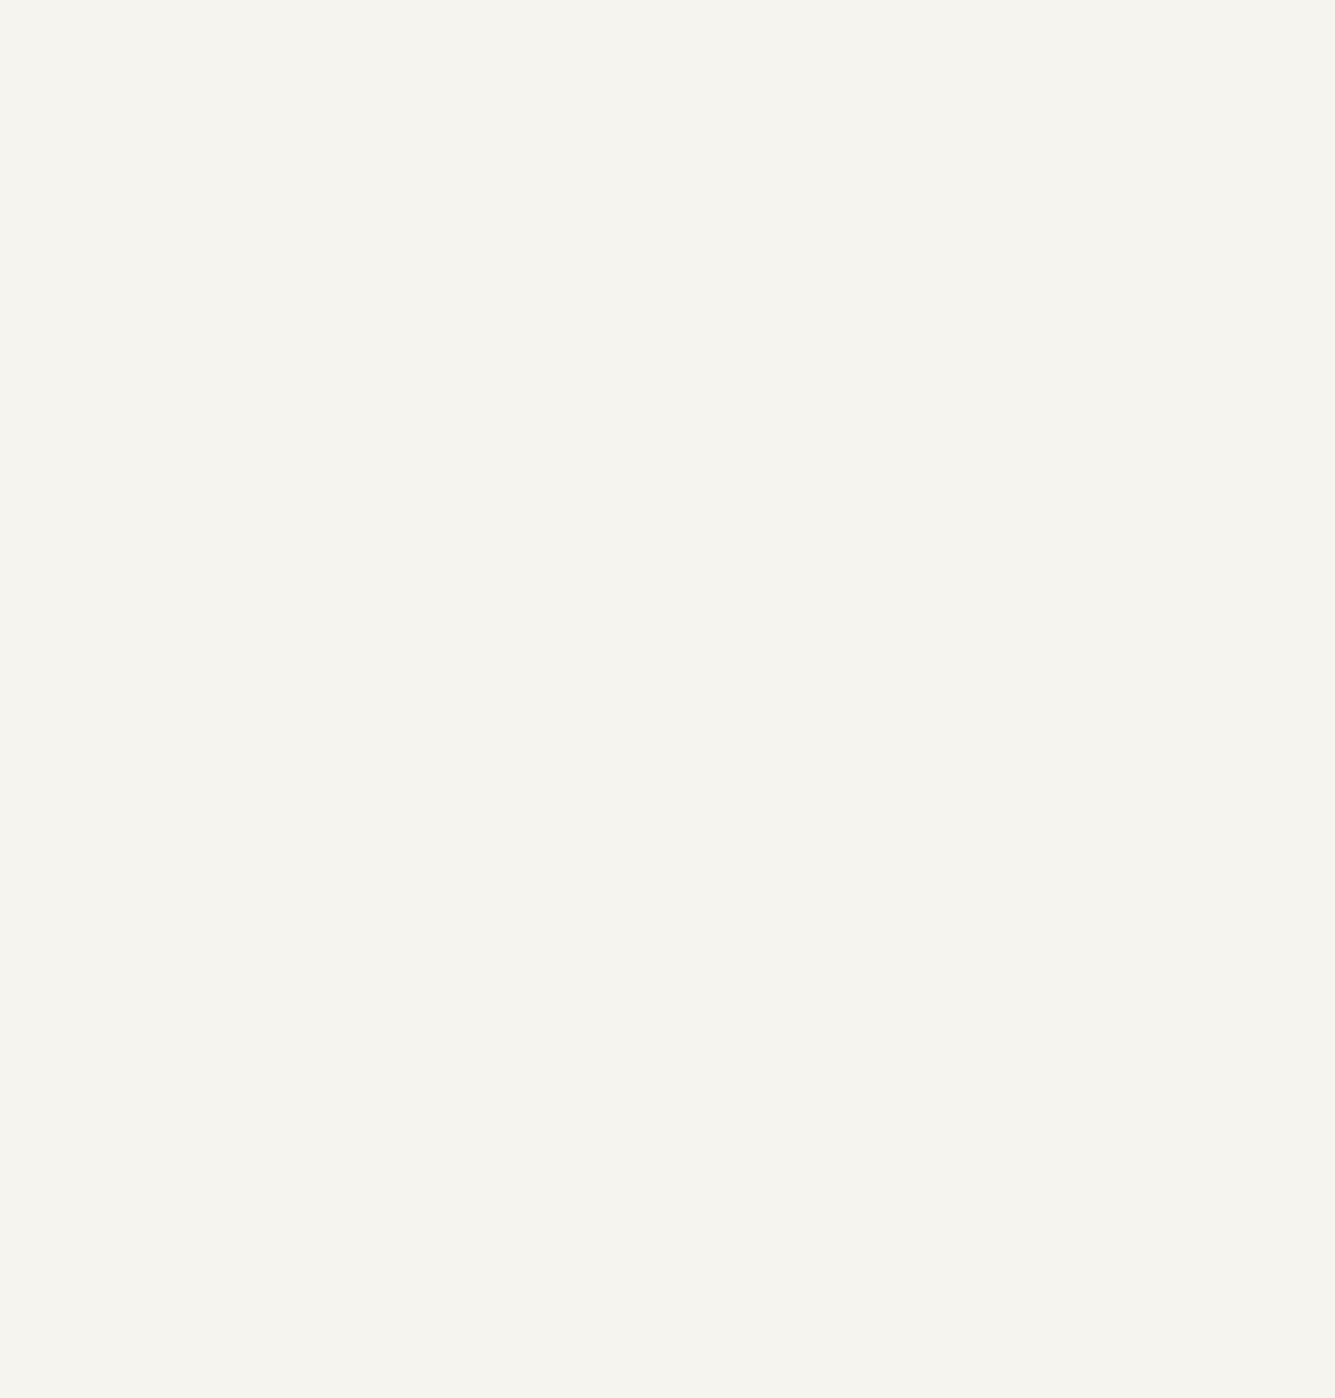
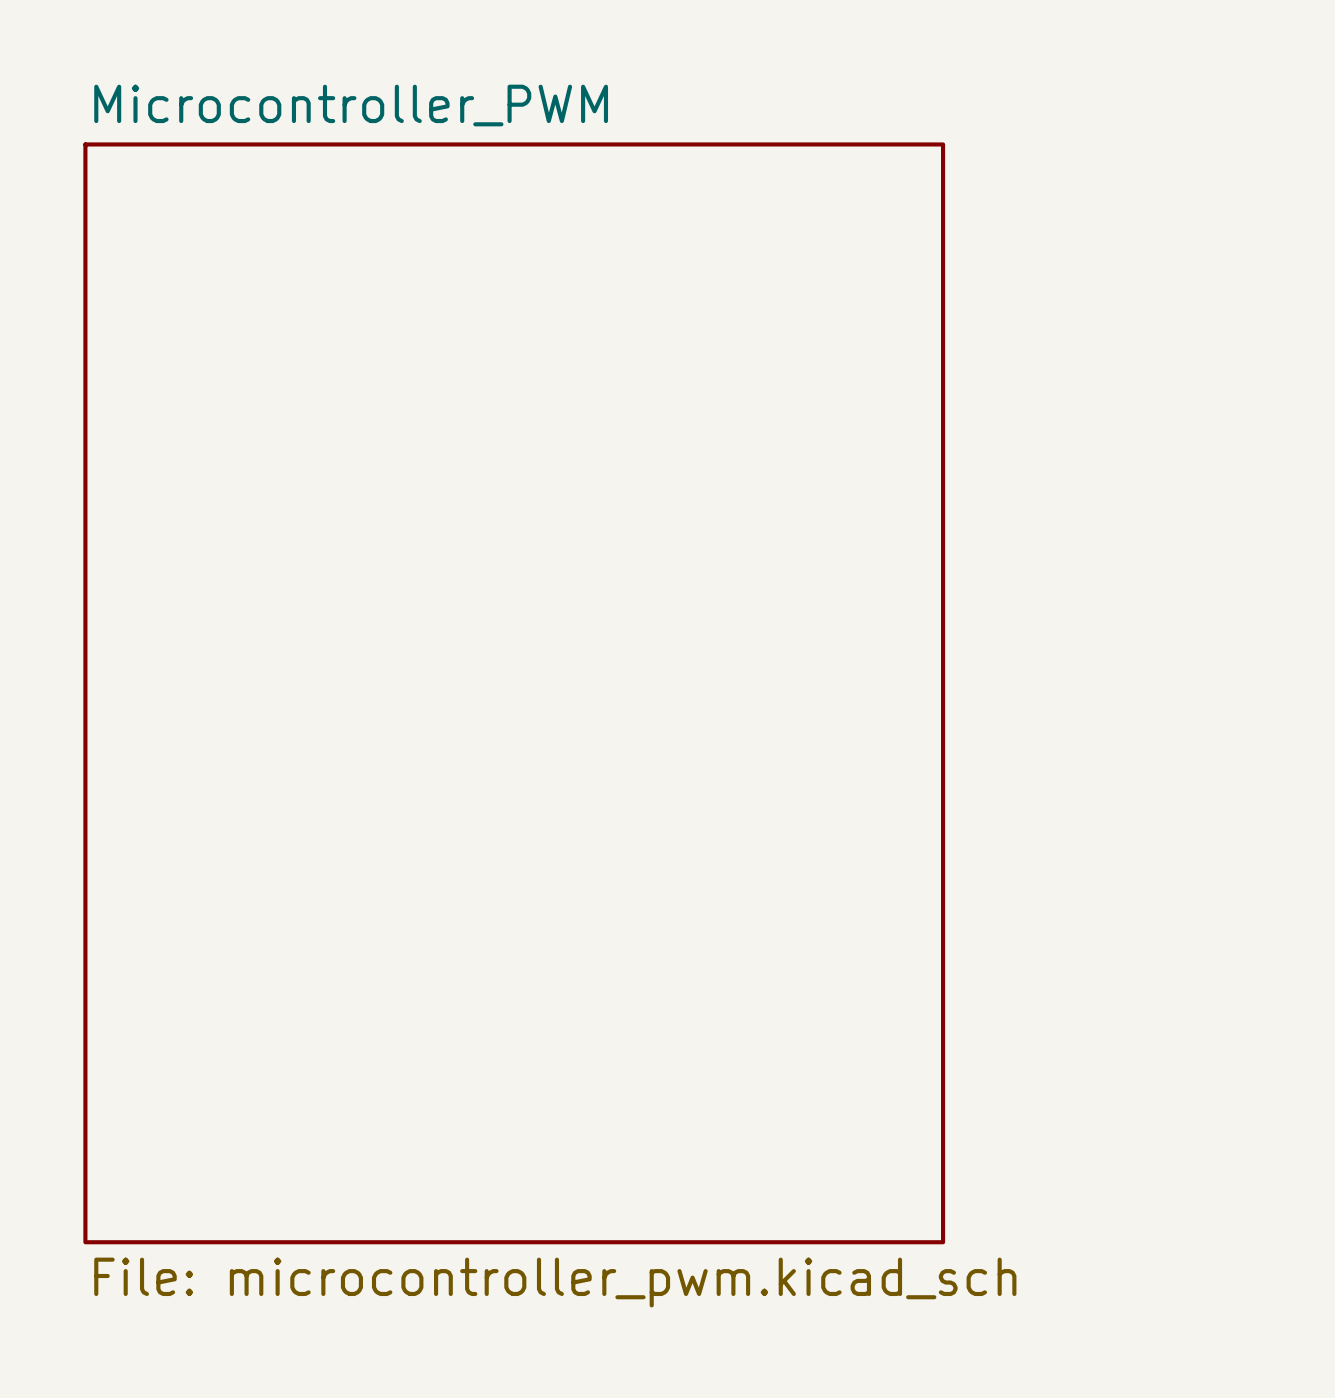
sheet Microcontroller_PWM: none -> File: microcontroller_pwm.kicad_sch (514, 693)

